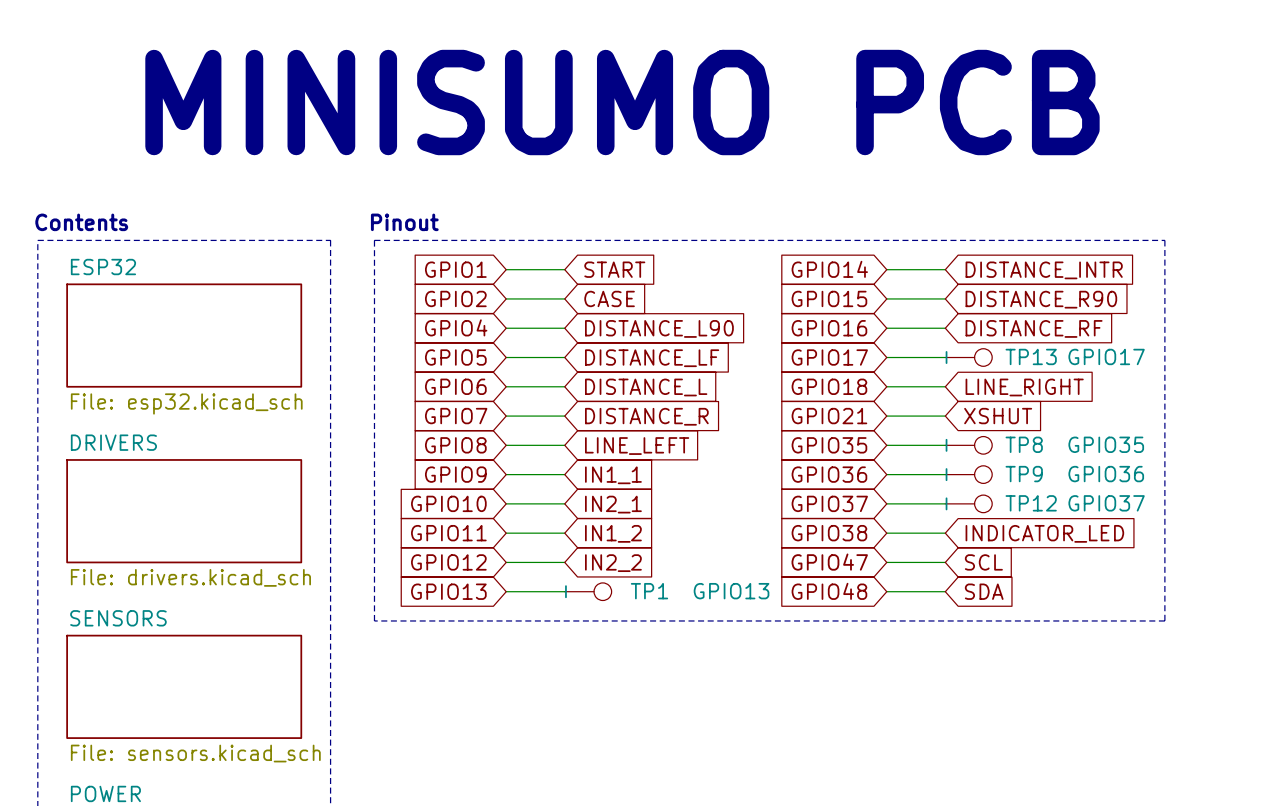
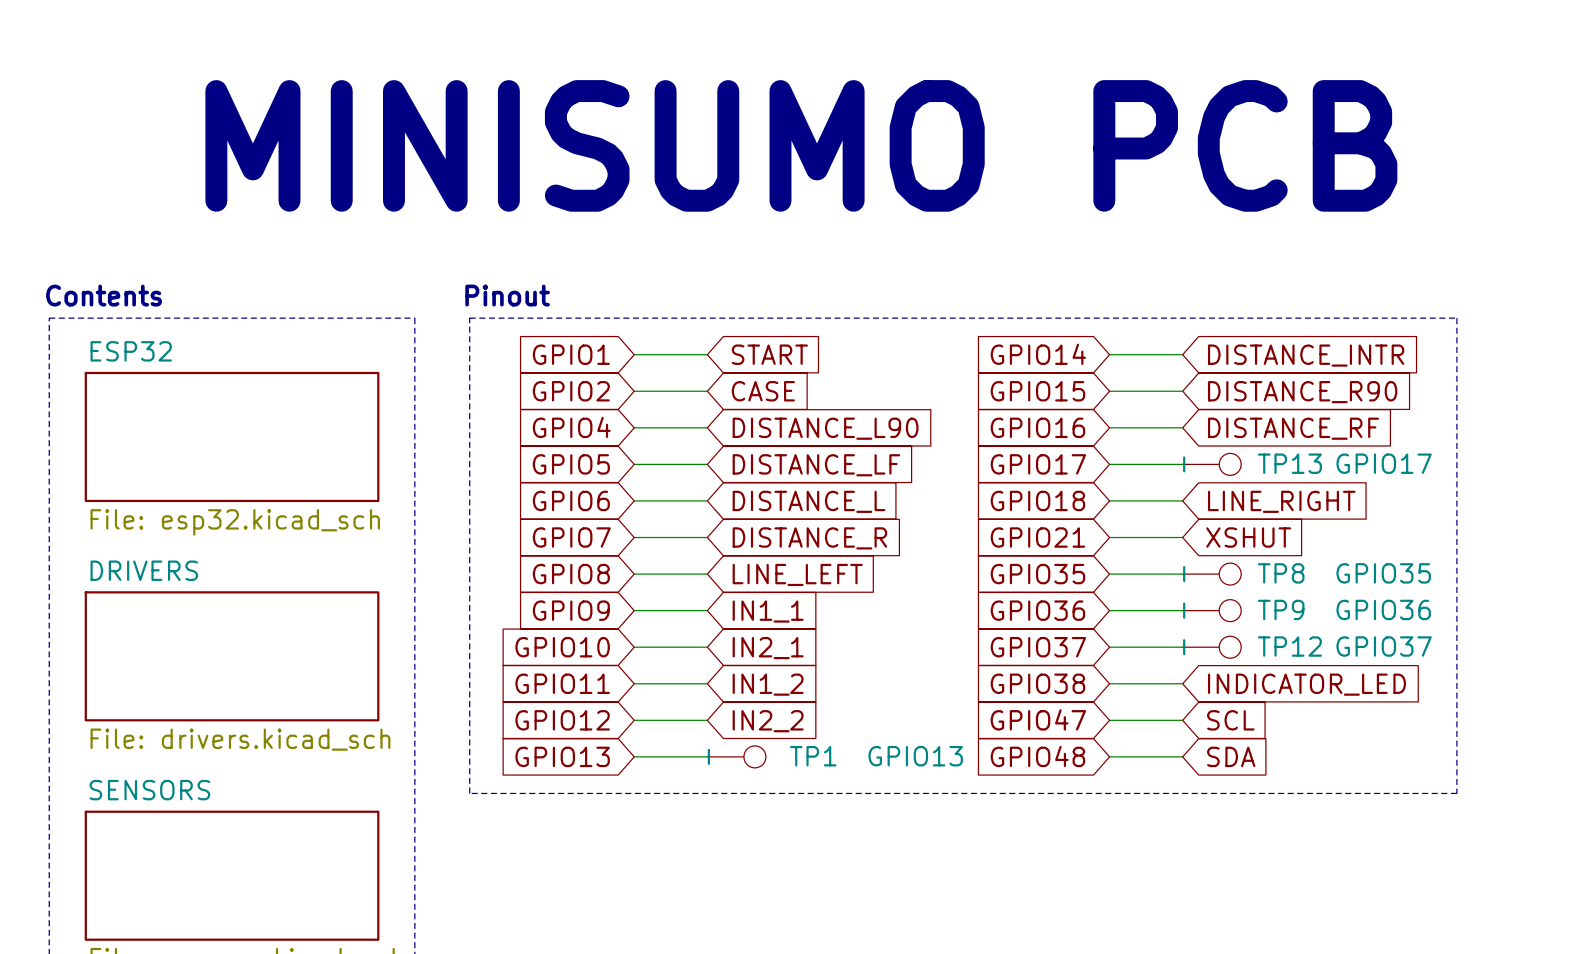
text position: MINISUMO PCB (622, 102) -> MINISUMO PCB (801, 145)

